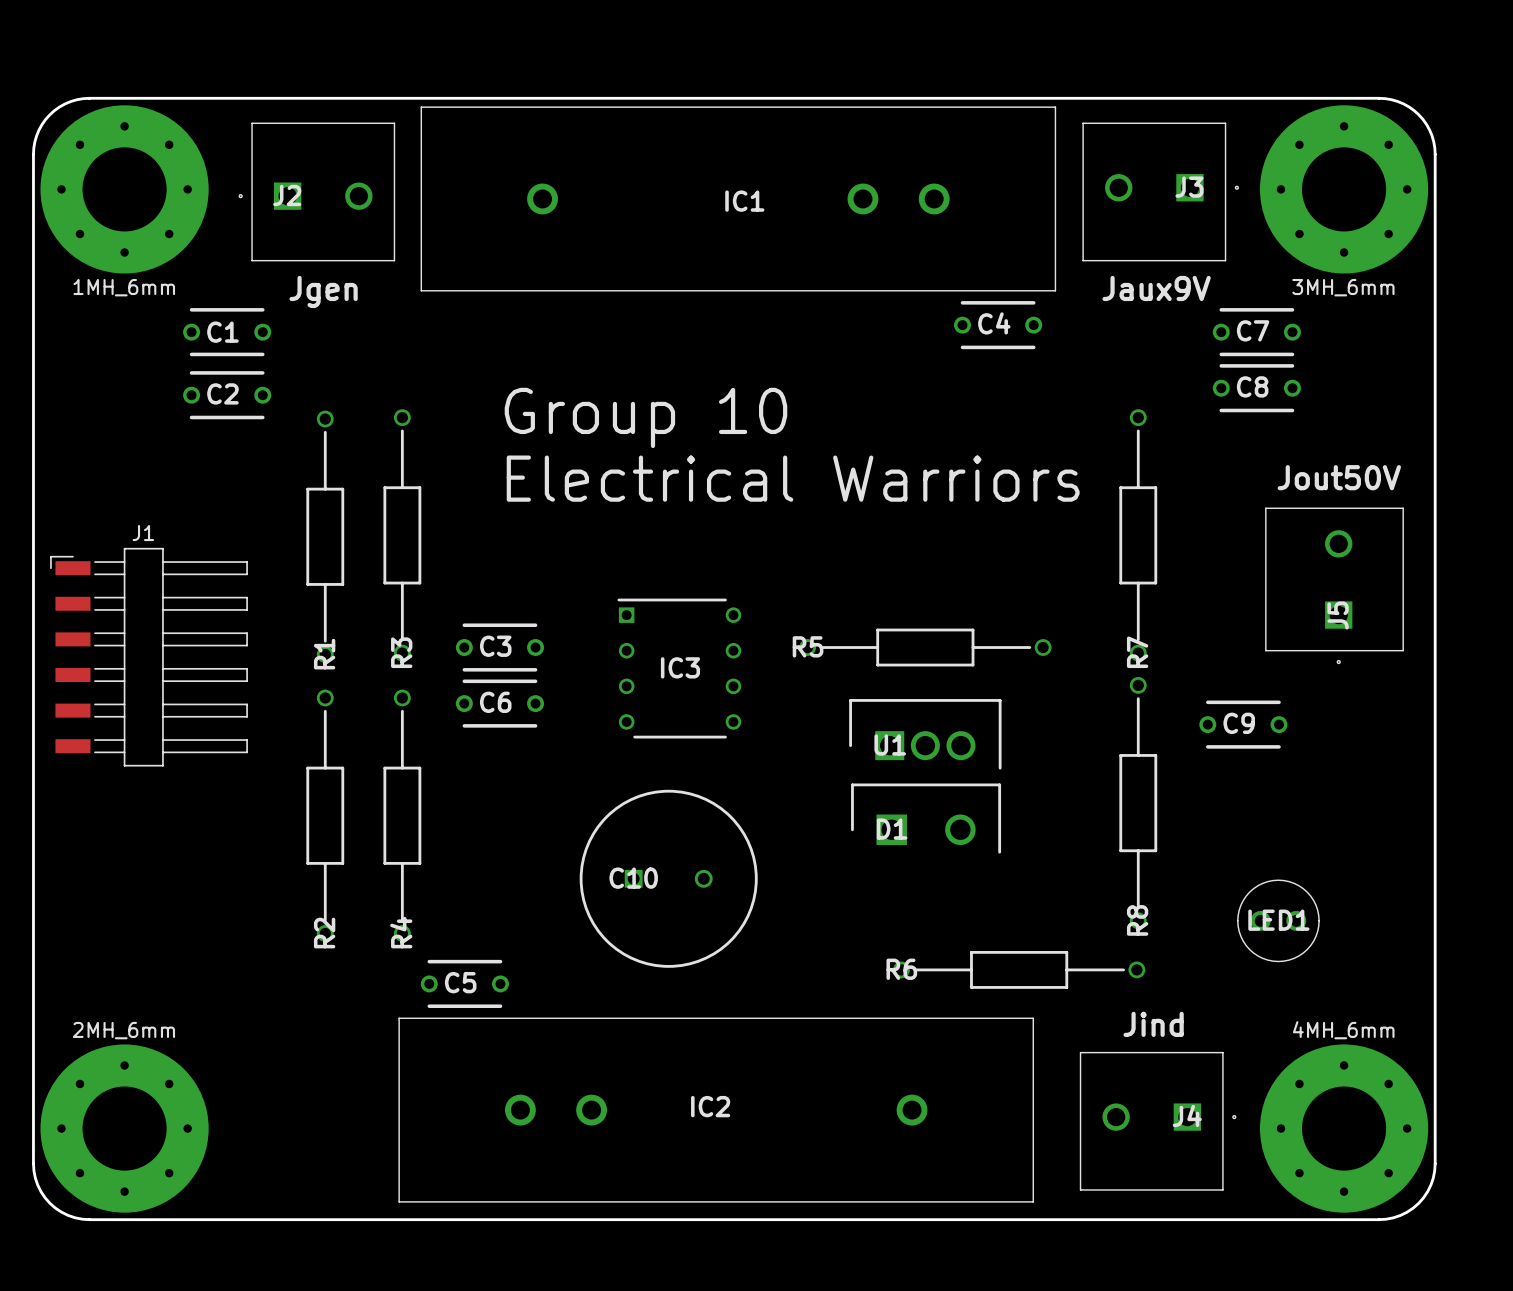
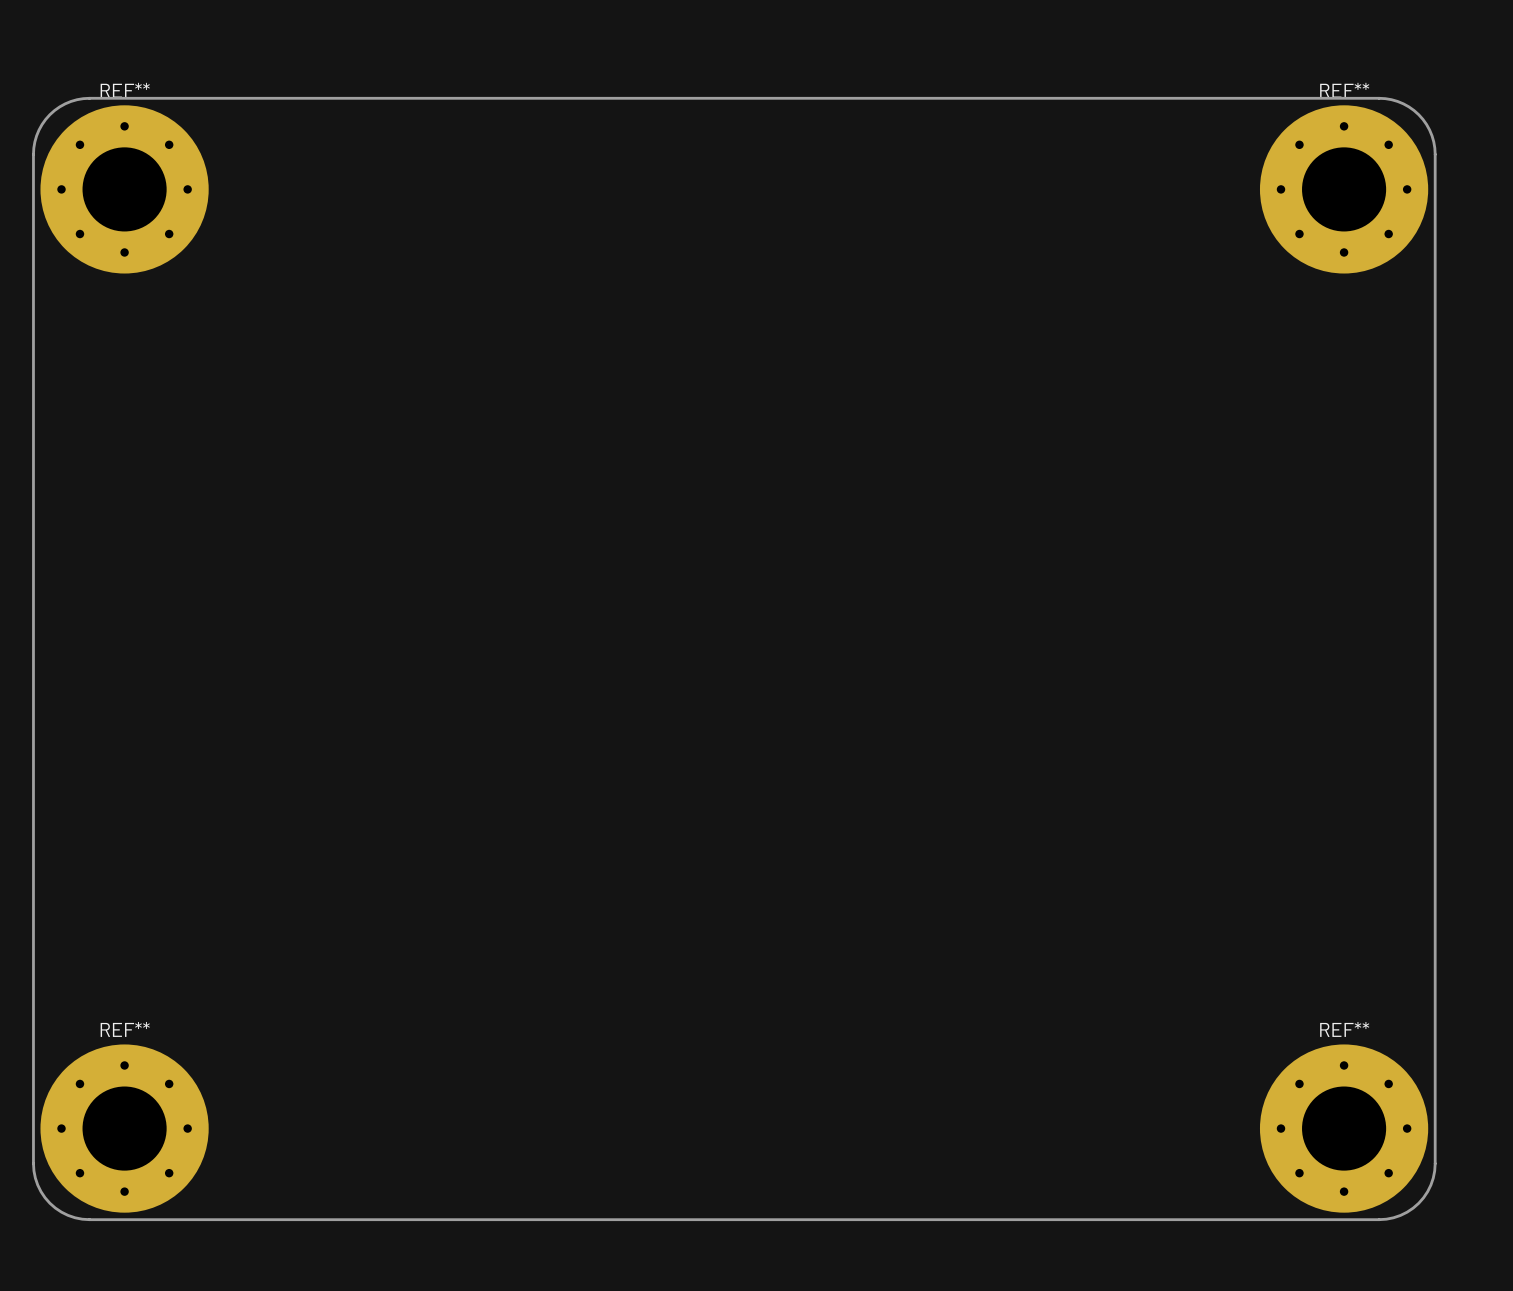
J2: (316, 191) -> none
J3: (1160, 191) -> none
IC1: (738, 198) -> none
1MH_6mm name: 1MH_6mm (124, 287) -> REF** (125, 90)
3MH_6mm name: 3MH_6mm (1343, 287) -> REF** (1344, 90)
text: Jaux9V (1156, 288) -> none
text: Jgen (323, 291) -> none
C4: (998, 325) -> none
C1: (227, 332) -> none
C7: (1256, 332) -> none
C8: (1256, 388) -> none
C2: (227, 395) -> none
text: Group 10 (645, 417) -> none
text: Jout50V (1339, 477) -> none
text: Electrical Warriors (793, 478) -> none
R3: (402, 535) -> none
R7: (1138, 535) -> none
R1: (325, 536) -> none
J5: (1334, 585) -> none
C3: (499, 647) -> none
R5: (925, 647) -> none
J1: (149, 657) -> none
IC3: (679, 668) -> none
C6: (499, 703) -> none
C9: (1243, 724) -> none
U1: (925, 734) -> none
R8: (1138, 803) -> none
R2: (325, 815) -> none
R4: (402, 815) -> none
D1: (926, 818) -> none
C10: (668, 878) -> none
LED1: (1278, 920) -> none
R6: (1019, 969) -> none
C5: (464, 983) -> none
text: Jind (1153, 1024) -> none
2MH_6mm name: 2MH_6mm (123, 1030) -> REF** (125, 1029)
4MH_6mm name: 4MH_6mm (1343, 1030) -> REF** (1344, 1029)
IC2: (716, 1110) -> none
J4: (1158, 1121) -> none

